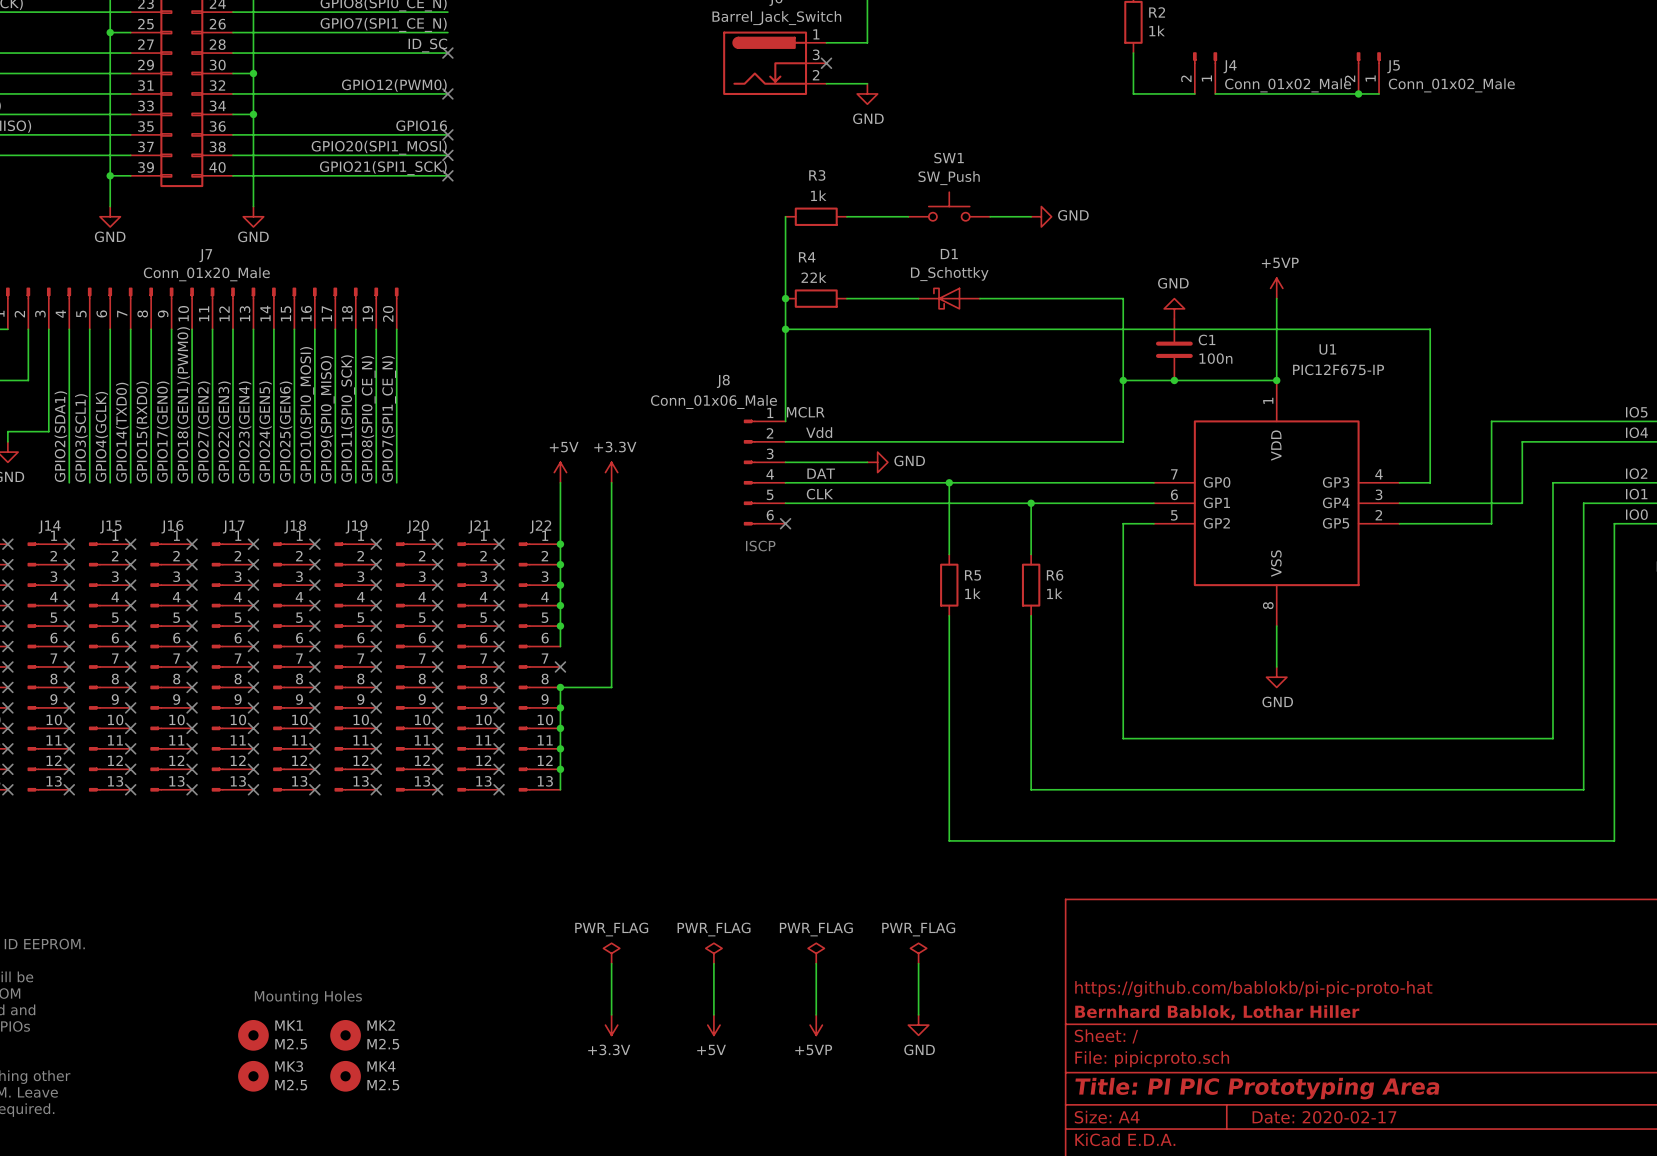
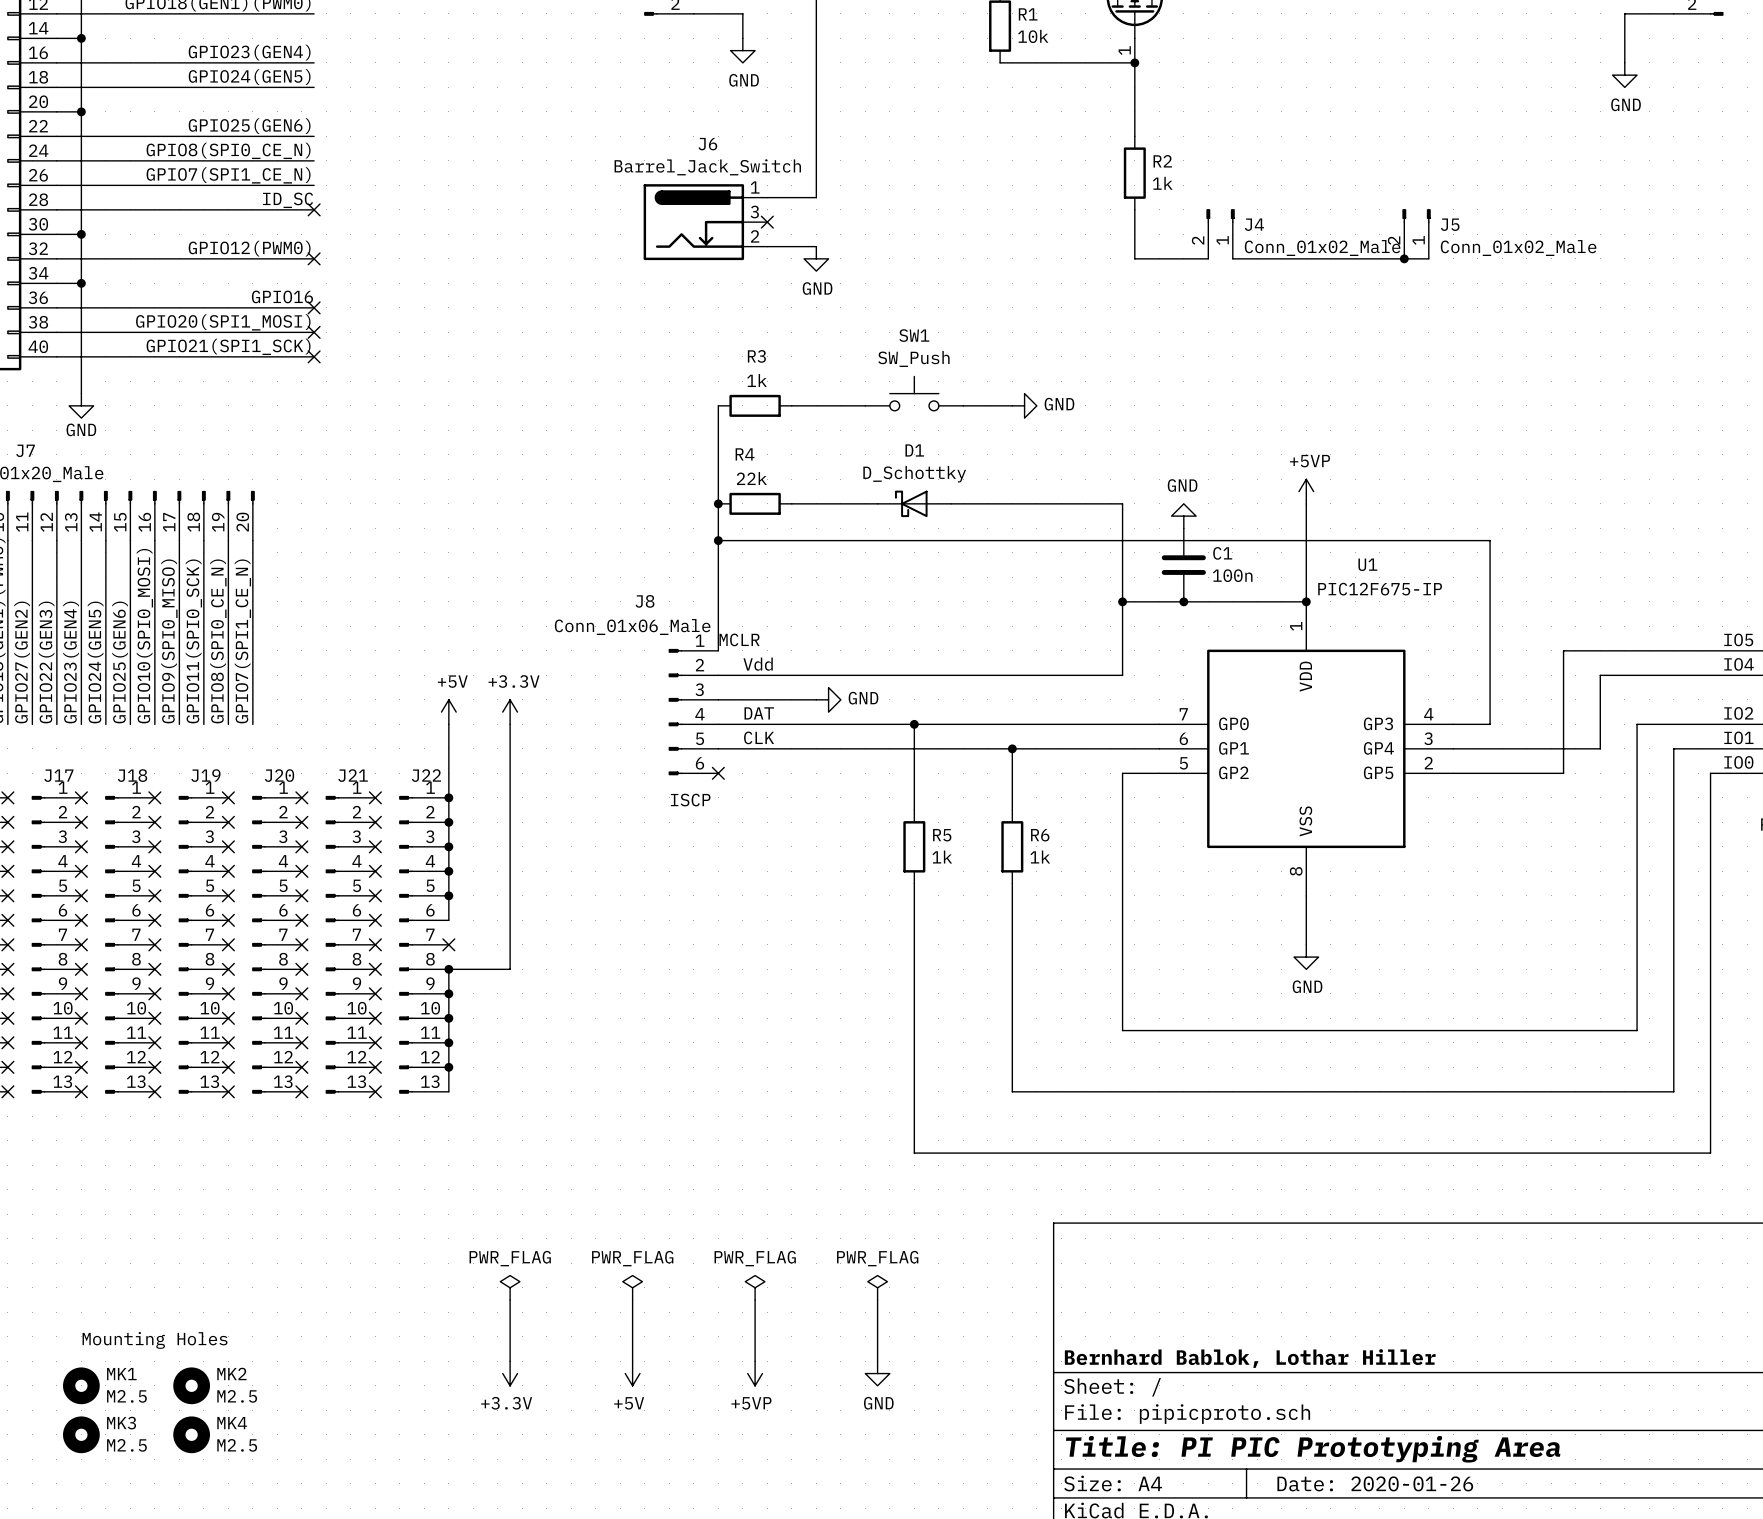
title block: https://github.com/bablokb/pi-pic-proto-hat (1253, 989) -> none
title block: Date: 2020-02-17 (1324, 1117) -> Date: 2020-01-26 (1375, 1483)

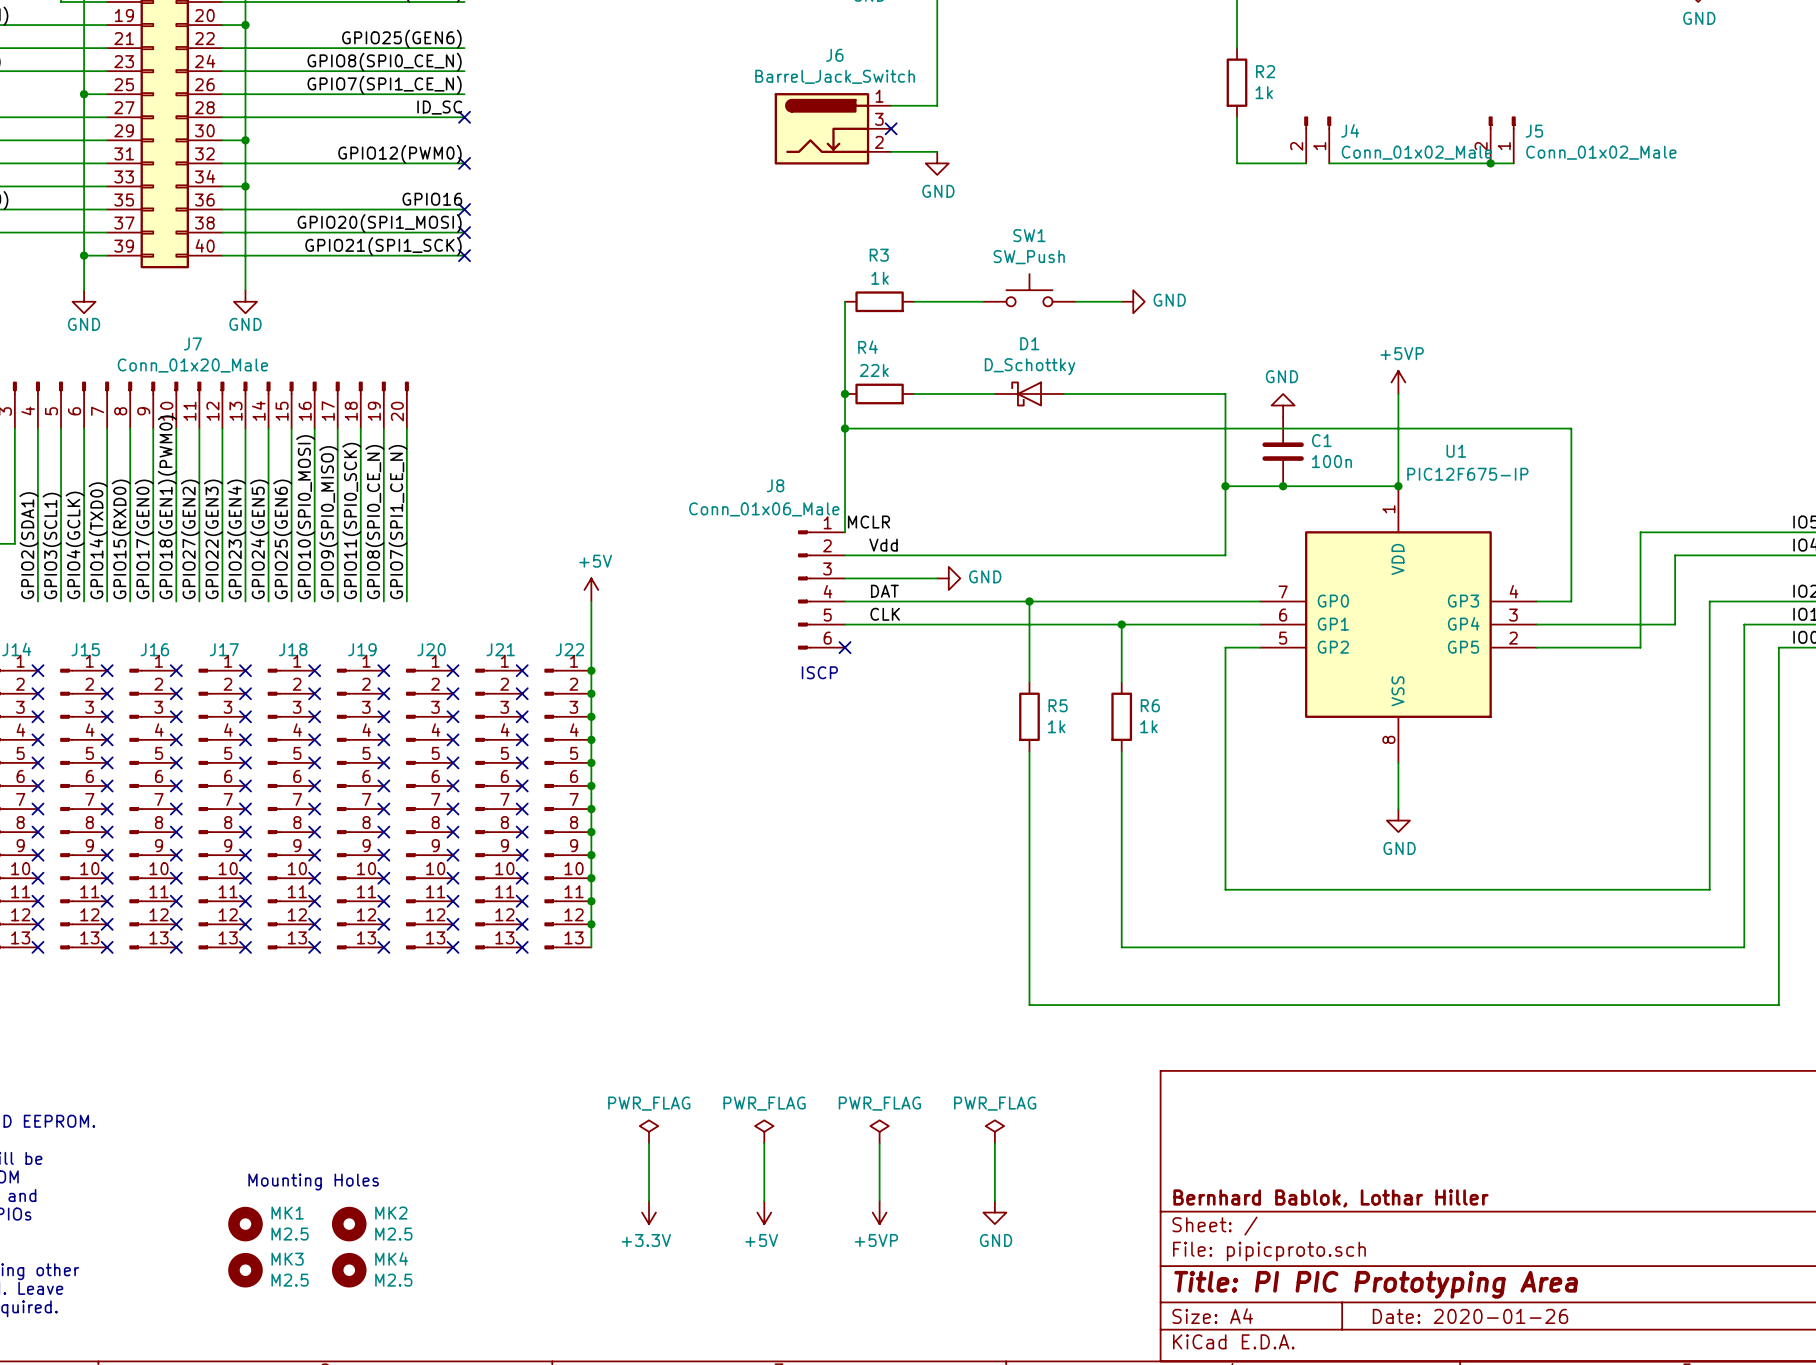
power symbol: +3.3V (510, 712) -> none
wire: (510, 724) (510, 969) (448, 969) -> (591, 785) (591, 832)
junction: none -> (591, 785)
no-connect mark: (448, 944) -> none
junction: none -> (591, 809)

